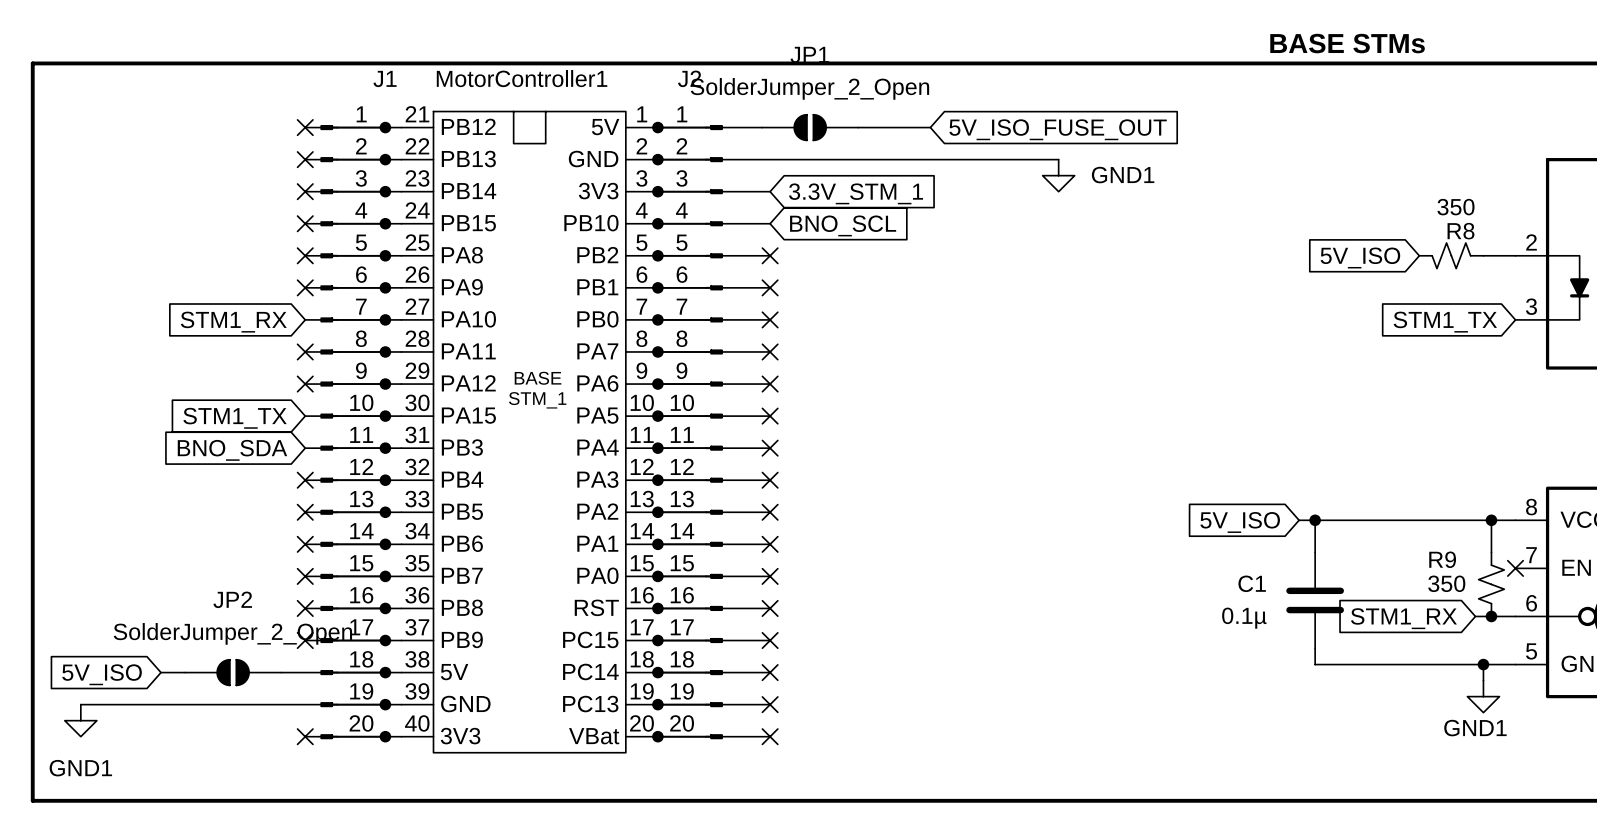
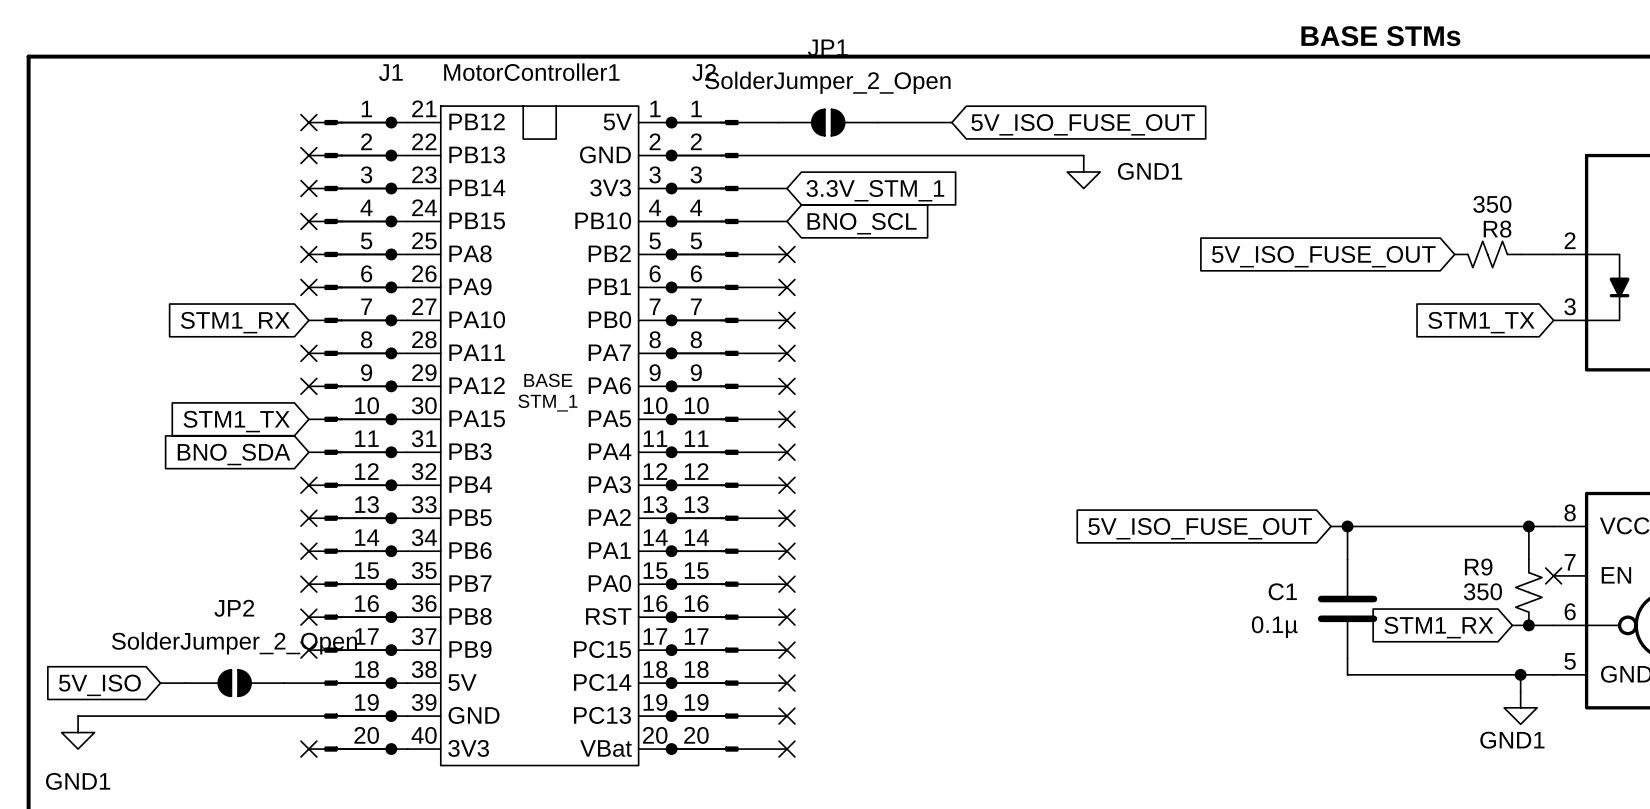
global label: 5V_ISO (1360, 257) -> 5V_ISO_FUSE_OUT (1323, 256)
global label: 5V_ISO (1240, 522) -> 5V_ISO_FUSE_OUT (1200, 528)

